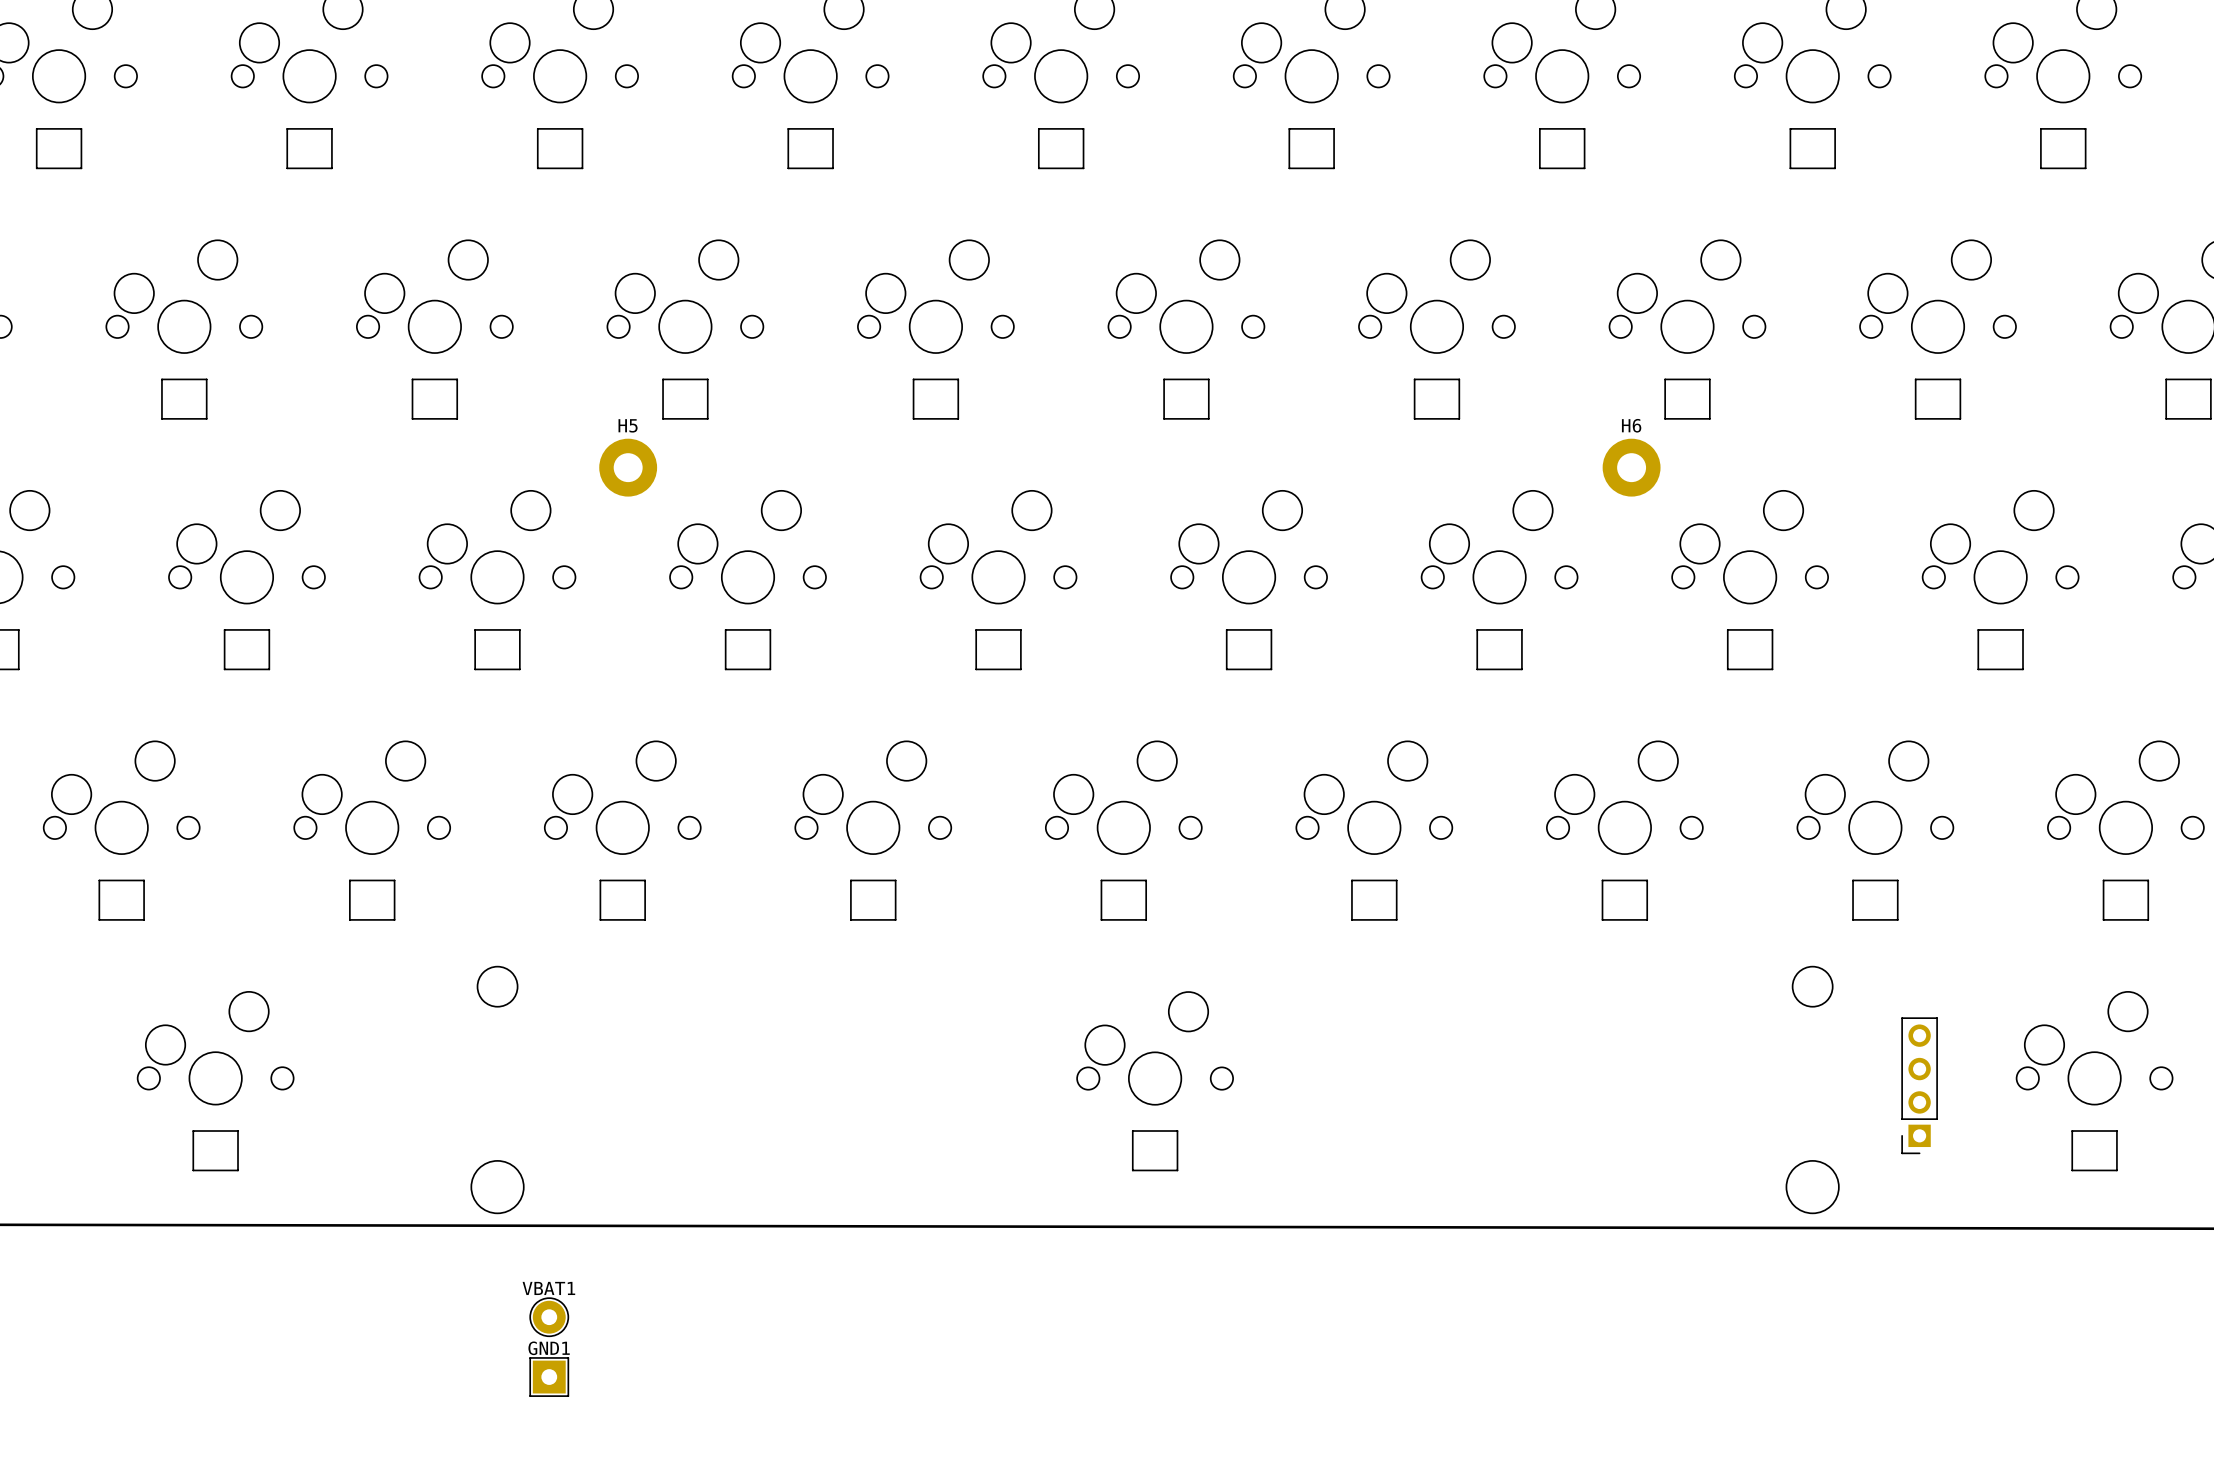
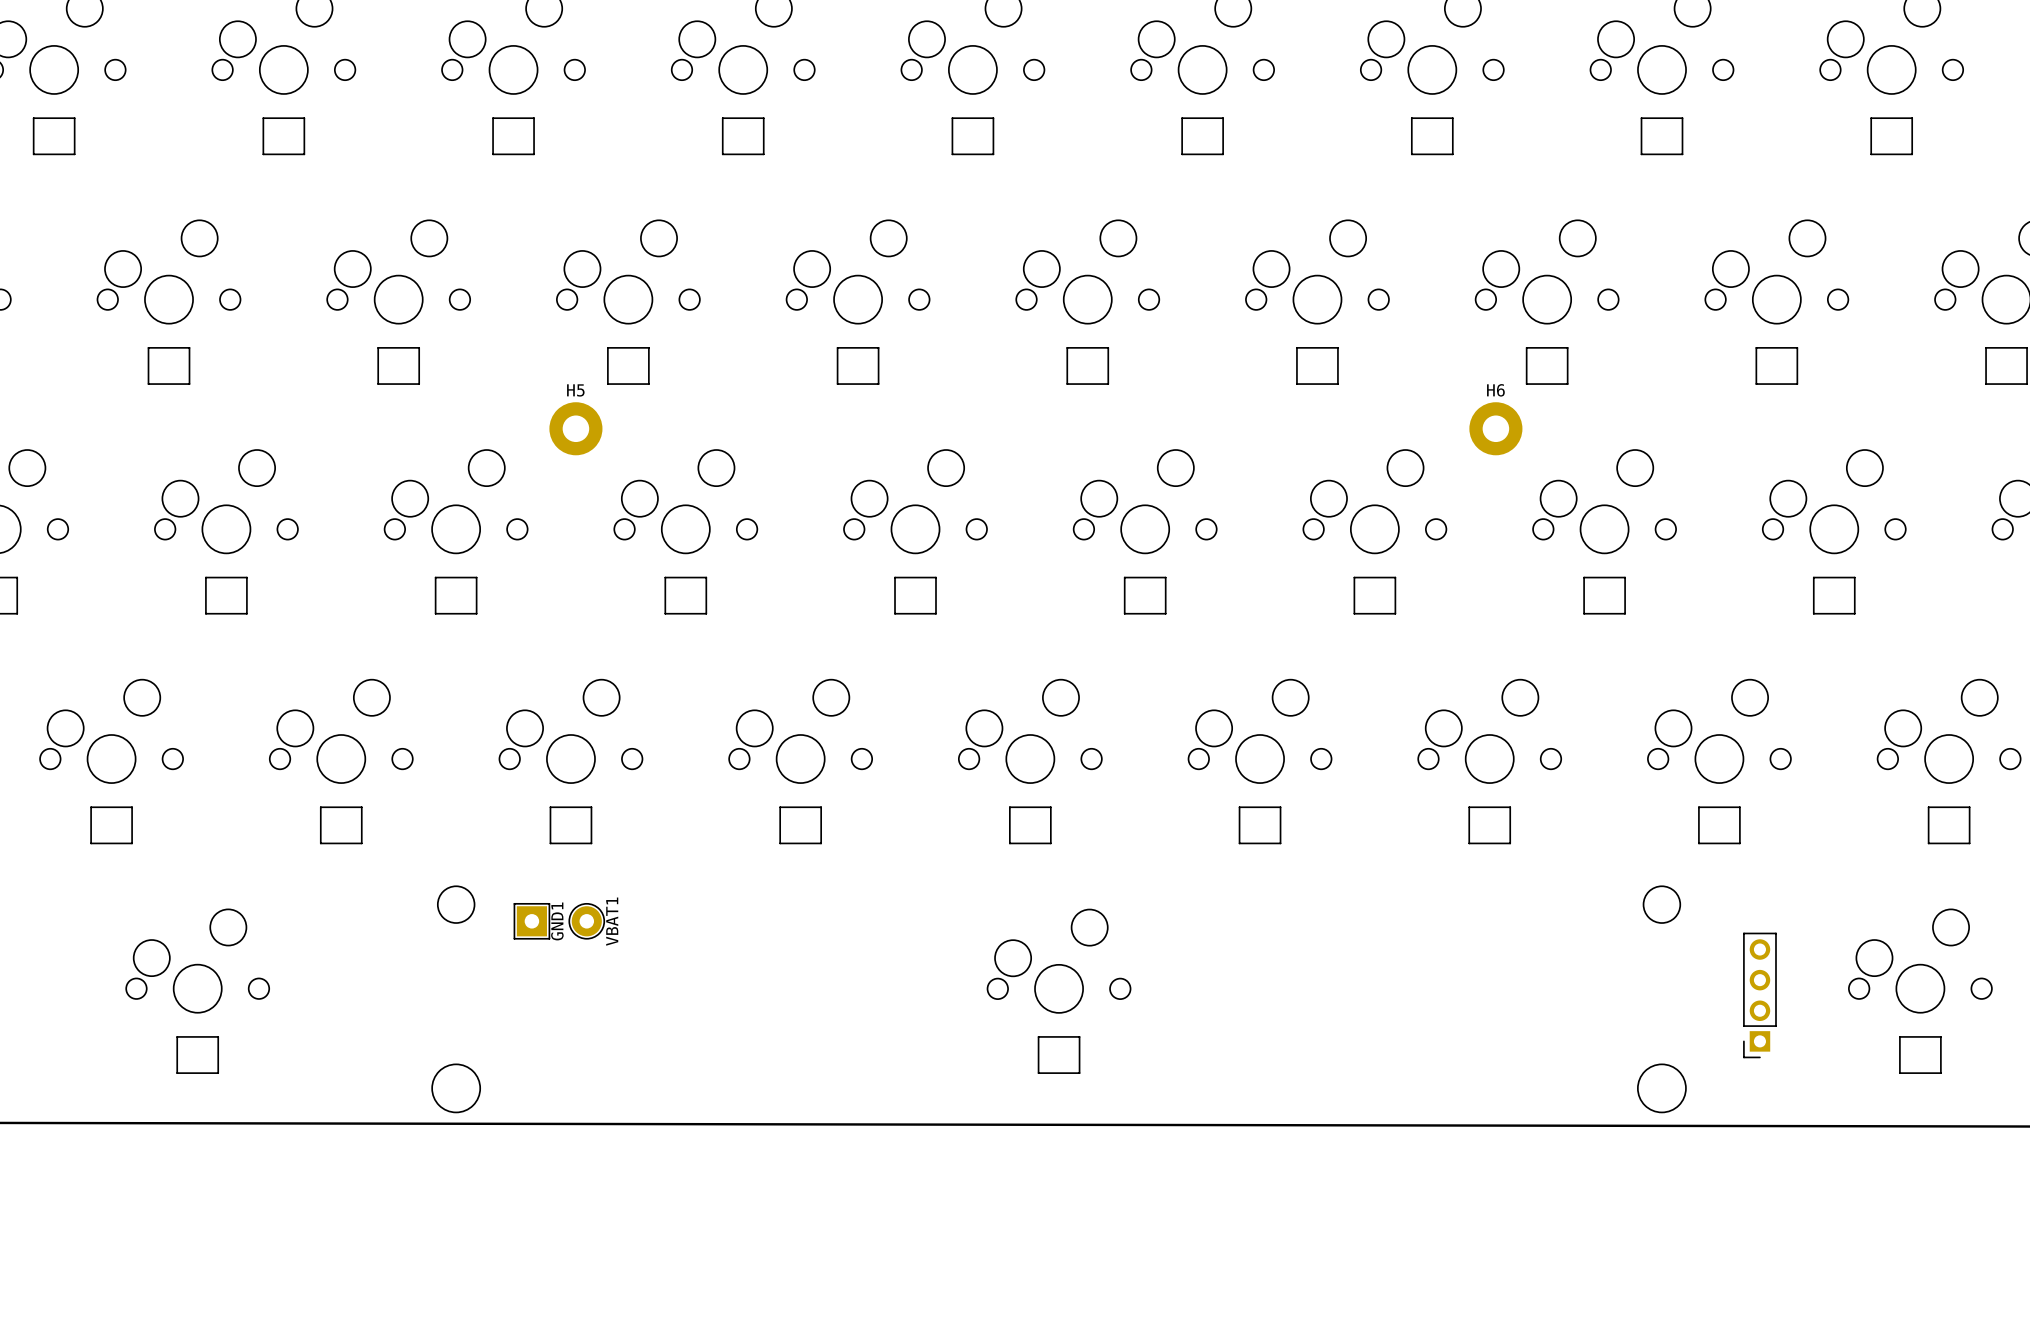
VBAT1 name rotation: 0° (548, 1288) -> 90° counterclockwise (612, 921)
VBAT1 position: (549, 1317) -> (586, 921)
GND1 name rotation: 0° (549, 1348) -> 90° counterclockwise (557, 921)
GND1 position: (549, 1377) -> (531, 921)

